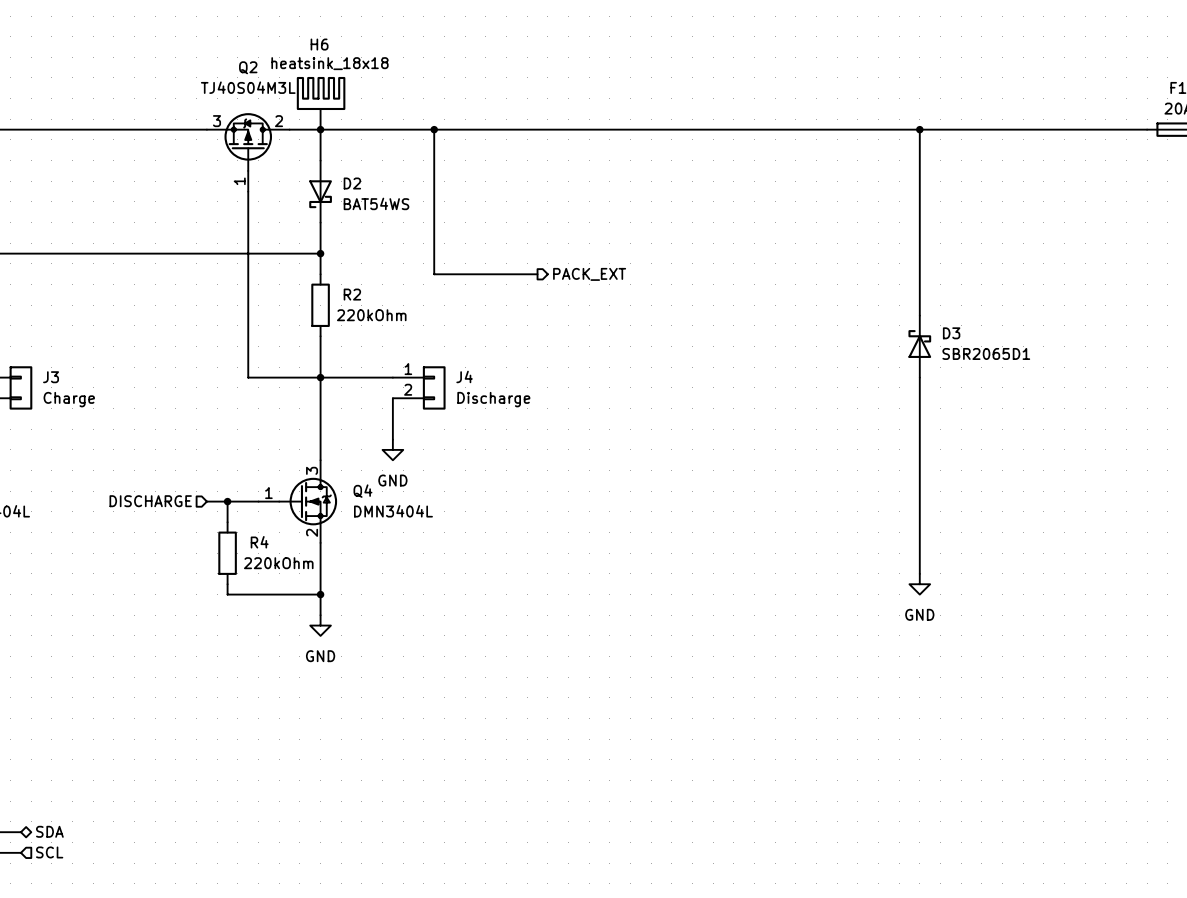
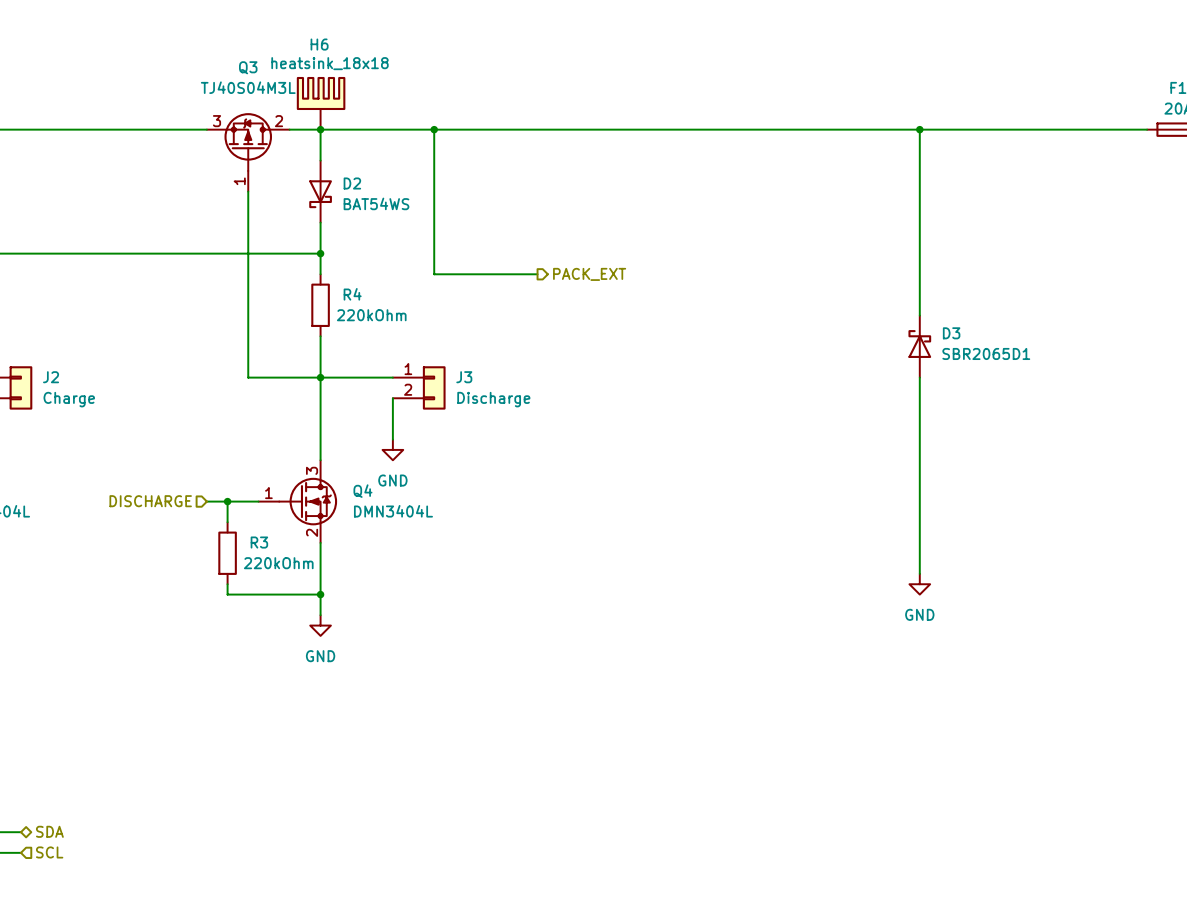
Q2 name: Q2 (248, 67) -> Q3 (248, 67)
R2 name: R2 (352, 294) -> R4 (352, 294)
J4 name: J4 (464, 376) -> J3 (464, 377)
J3 name: J3 (51, 377) -> J2 (51, 377)
R4 name: R4 (259, 542) -> R3 (259, 542)

